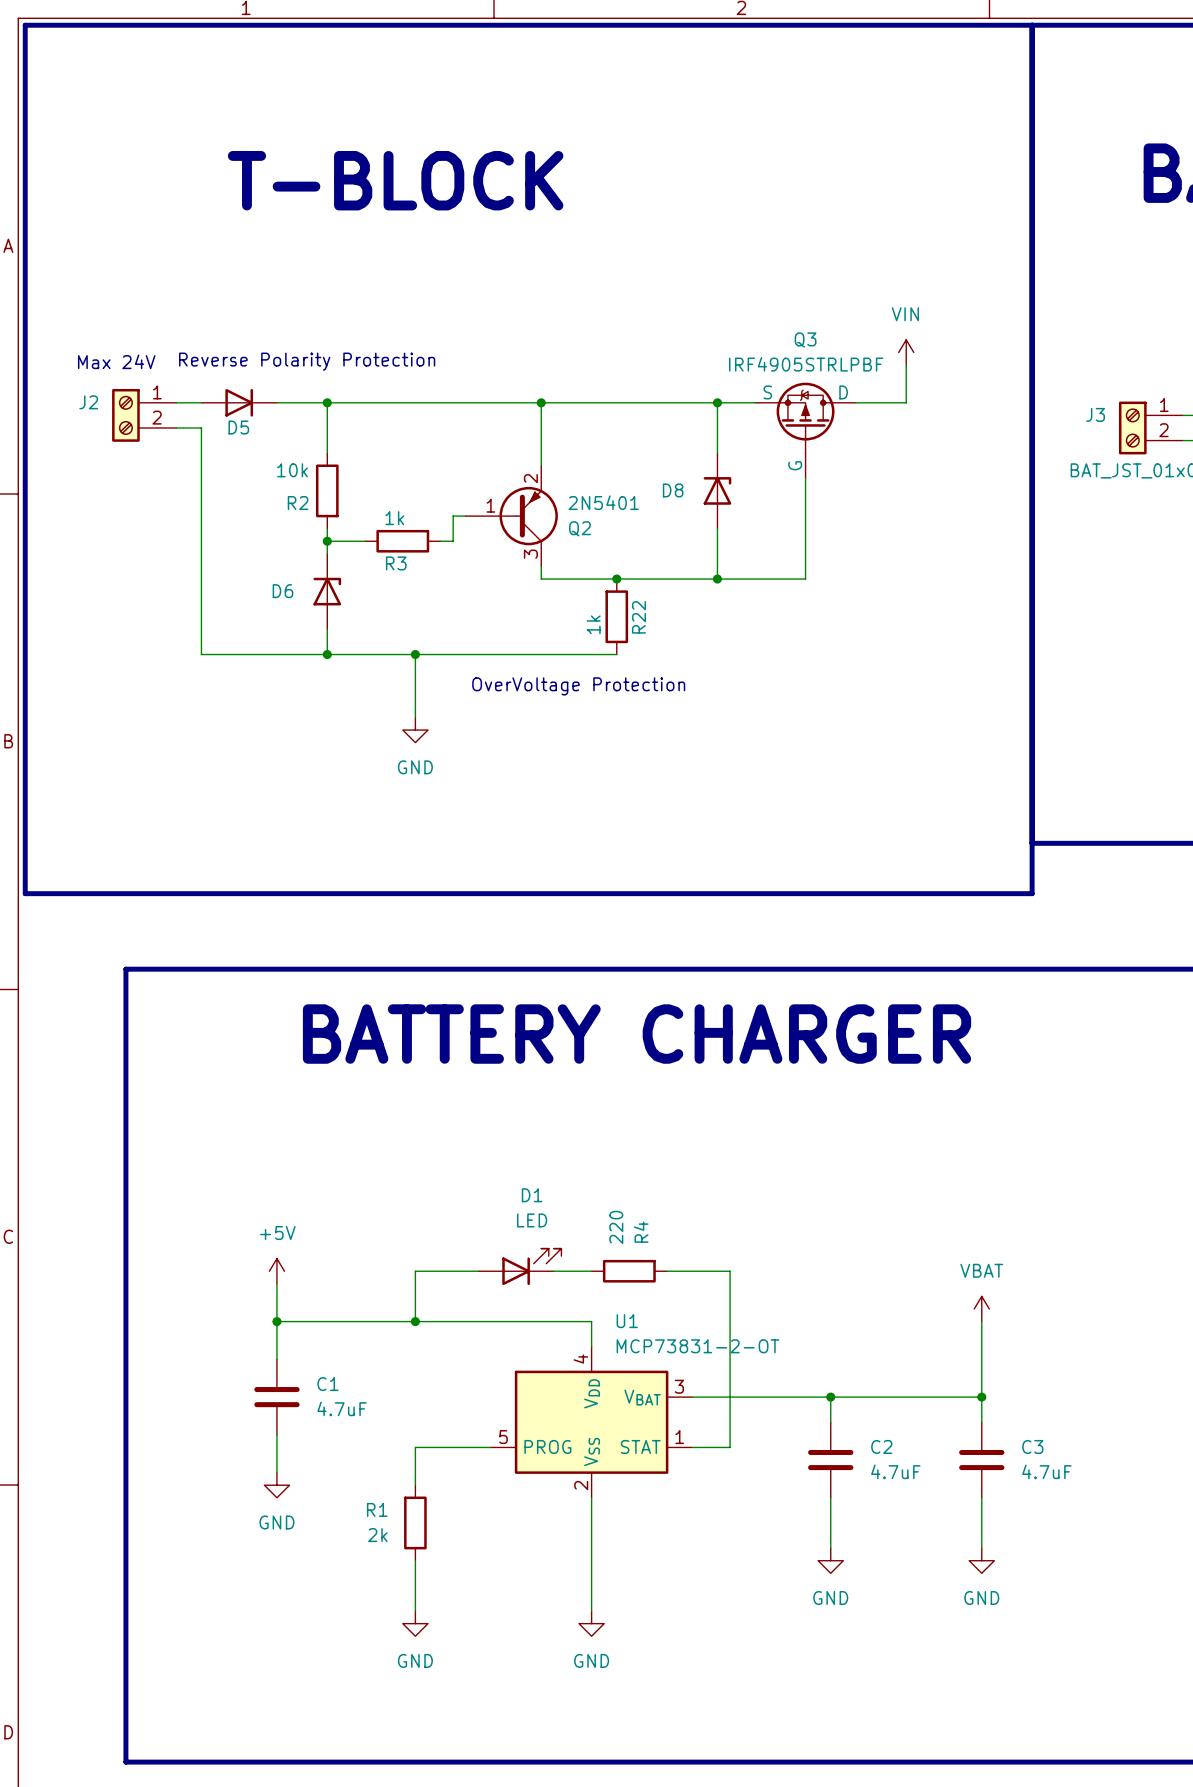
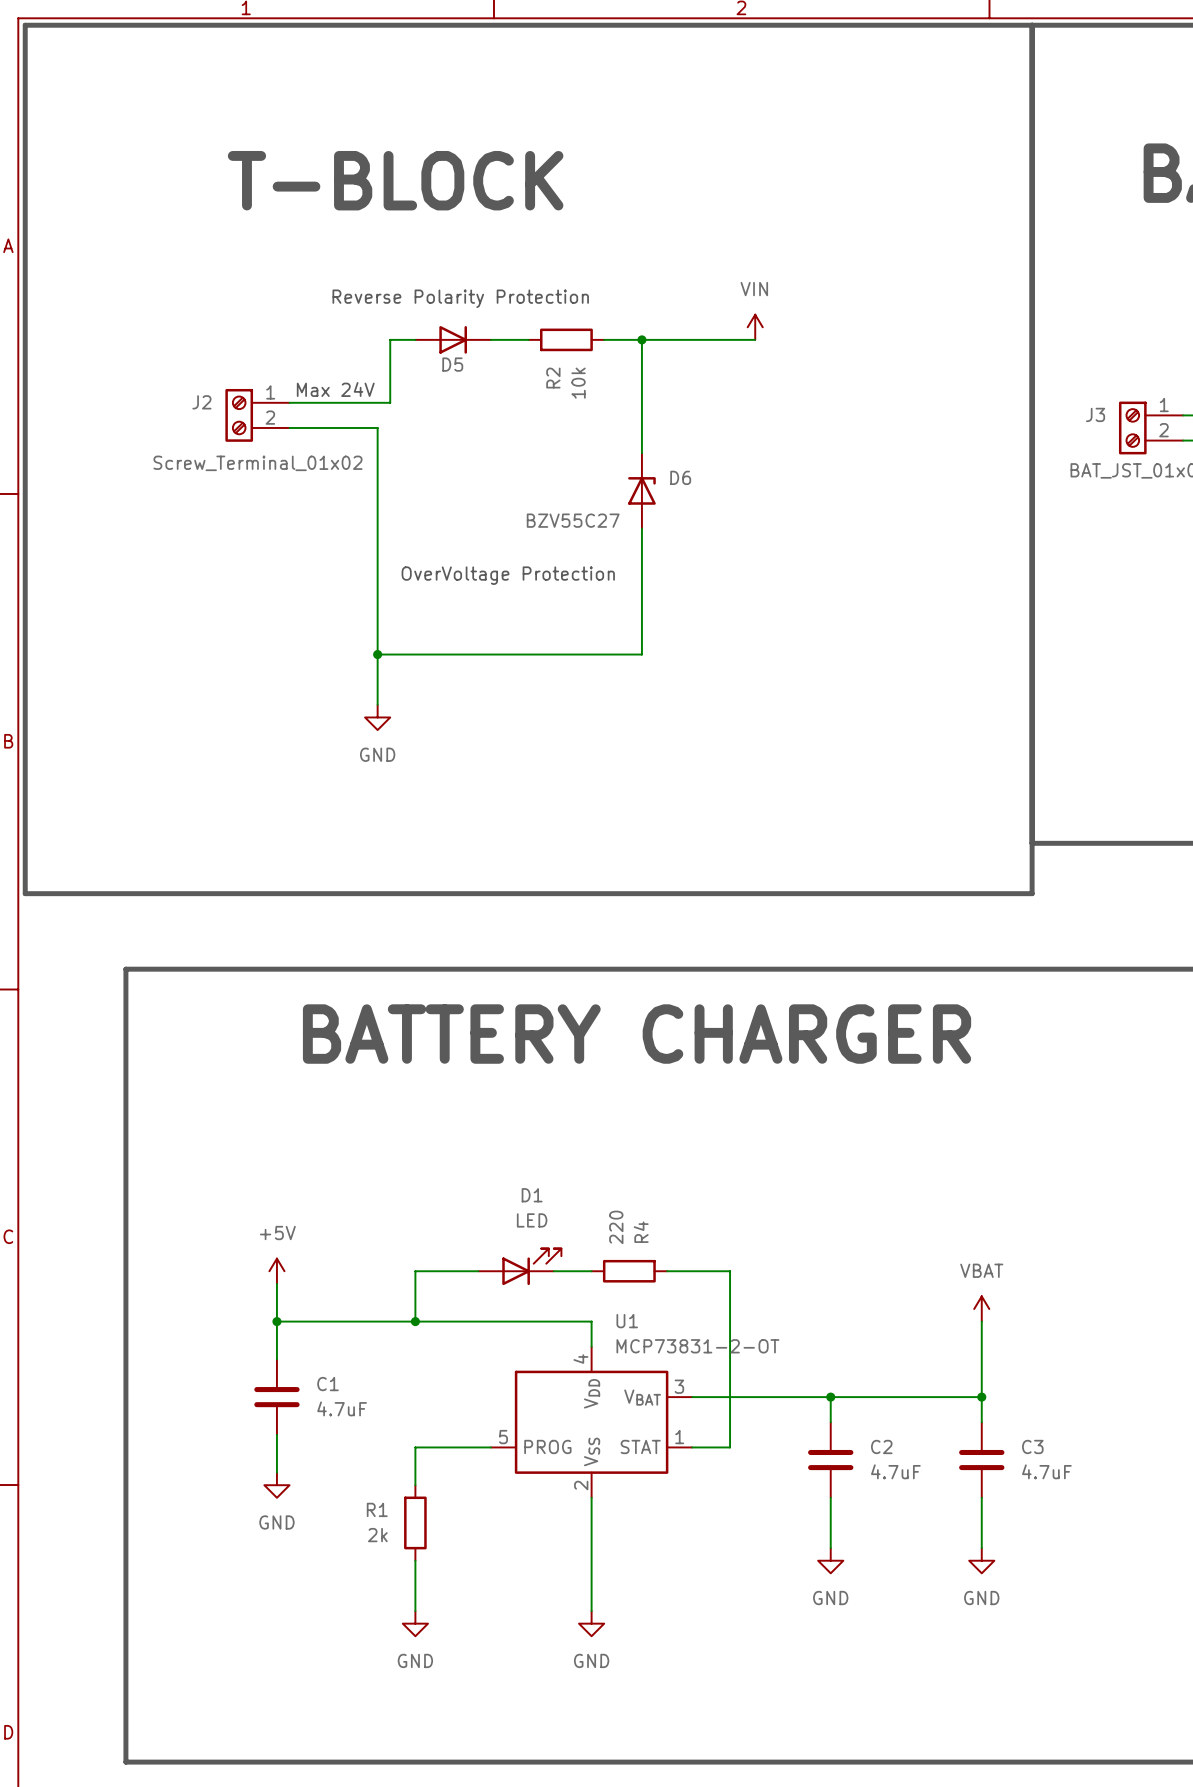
wire: none -> (490, 339) (528, 339)
wire: none -> (604, 339) (755, 339)
wire: none -> (641, 339) (641, 453)
junction: none -> (641, 339)
power symbol position: VIN (906, 352) -> VIN (755, 327)
text position: Max 24V (116, 361) -> Max 24V (335, 389)
text position: Reverse Polarity Protection (307, 361) -> Reverse Polarity Protection (460, 298)
wire: (906, 365) (906, 402) (855, 402) -> none
wire: (176, 402) (201, 402) -> none
D5 position: (239, 402) -> (453, 339)
wire: (327, 402) (327, 453) -> none
junction: (327, 402) -> none
wire: (390, 402) (755, 402) -> (390, 402) (390, 339) (415, 339)
wire: (541, 402) (541, 465) -> none
junction: (541, 402) -> none
wire: (717, 402) (717, 453) -> none
junction: (717, 402) -> none
J2 position: (144, 415) -> (257, 415)
wire: (176, 427) (201, 427) (201, 654) (377, 654) -> none
wire: none -> (289, 427) (377, 427) (377, 704)
Q3: IRF4905STRLPBF (805, 430) -> none
J2 value: none -> Screw_Terminal_01x02 (257, 463)
R2 value position: 10k (292, 470) -> 10k (578, 383)
wire: (805, 478) (805, 579) (541, 579) (541, 566) -> none
R2 rotation: 0° (327, 490) -> 90° clockwise (566, 339)
R2 position: (327, 490) -> (566, 339)
D8: (717, 490) -> none
R2 name position: R2 (298, 503) -> R2 (553, 378)
wire: (465, 516) (453, 516) (453, 541) (440, 541) -> none
Q2: 2N5401 (511, 516) -> none
D6 value: none -> BZV55C27 (573, 520)
wire: (327, 528) (327, 553) -> none
wire: none -> (641, 528) (641, 654) (616, 654)
wire: (717, 528) (717, 579) -> none
wire: (327, 541) (365, 541) -> none
junction: (327, 541) -> none
R3: 1k (402, 541) -> none
junction: (616, 579) -> none
junction: (717, 579) -> none
D6 name position: D6 (282, 591) -> D6 (680, 477)
D6 position: (327, 591) -> (641, 490)
R22: 1k (616, 616) -> none
wire: (327, 629) (327, 654) -> none
junction: (327, 654) -> none
junction: none -> (377, 654)
wire: (415, 654) (415, 717) -> none
junction: (415, 654) -> none
text position: OverVoltage Protection (578, 686) -> OverVoltage Protection (508, 575)
power symbol position: GND (415, 730) -> GND (377, 717)

